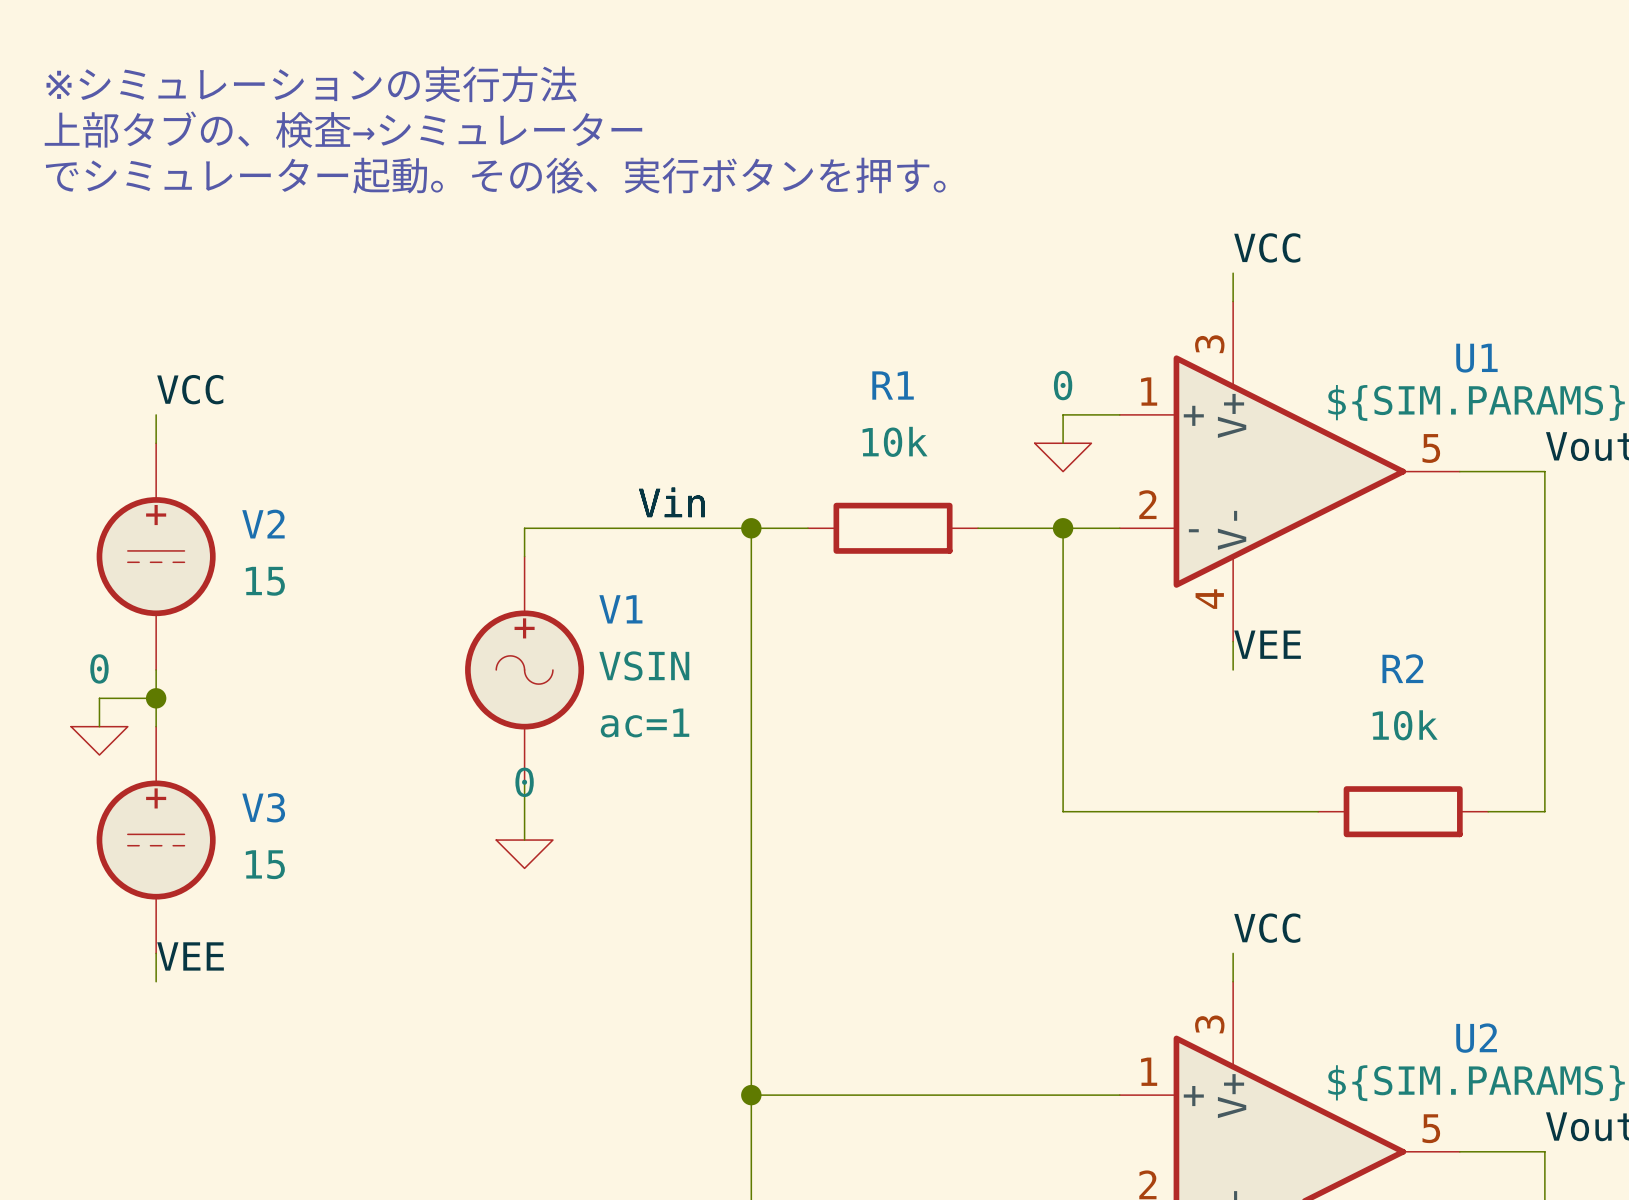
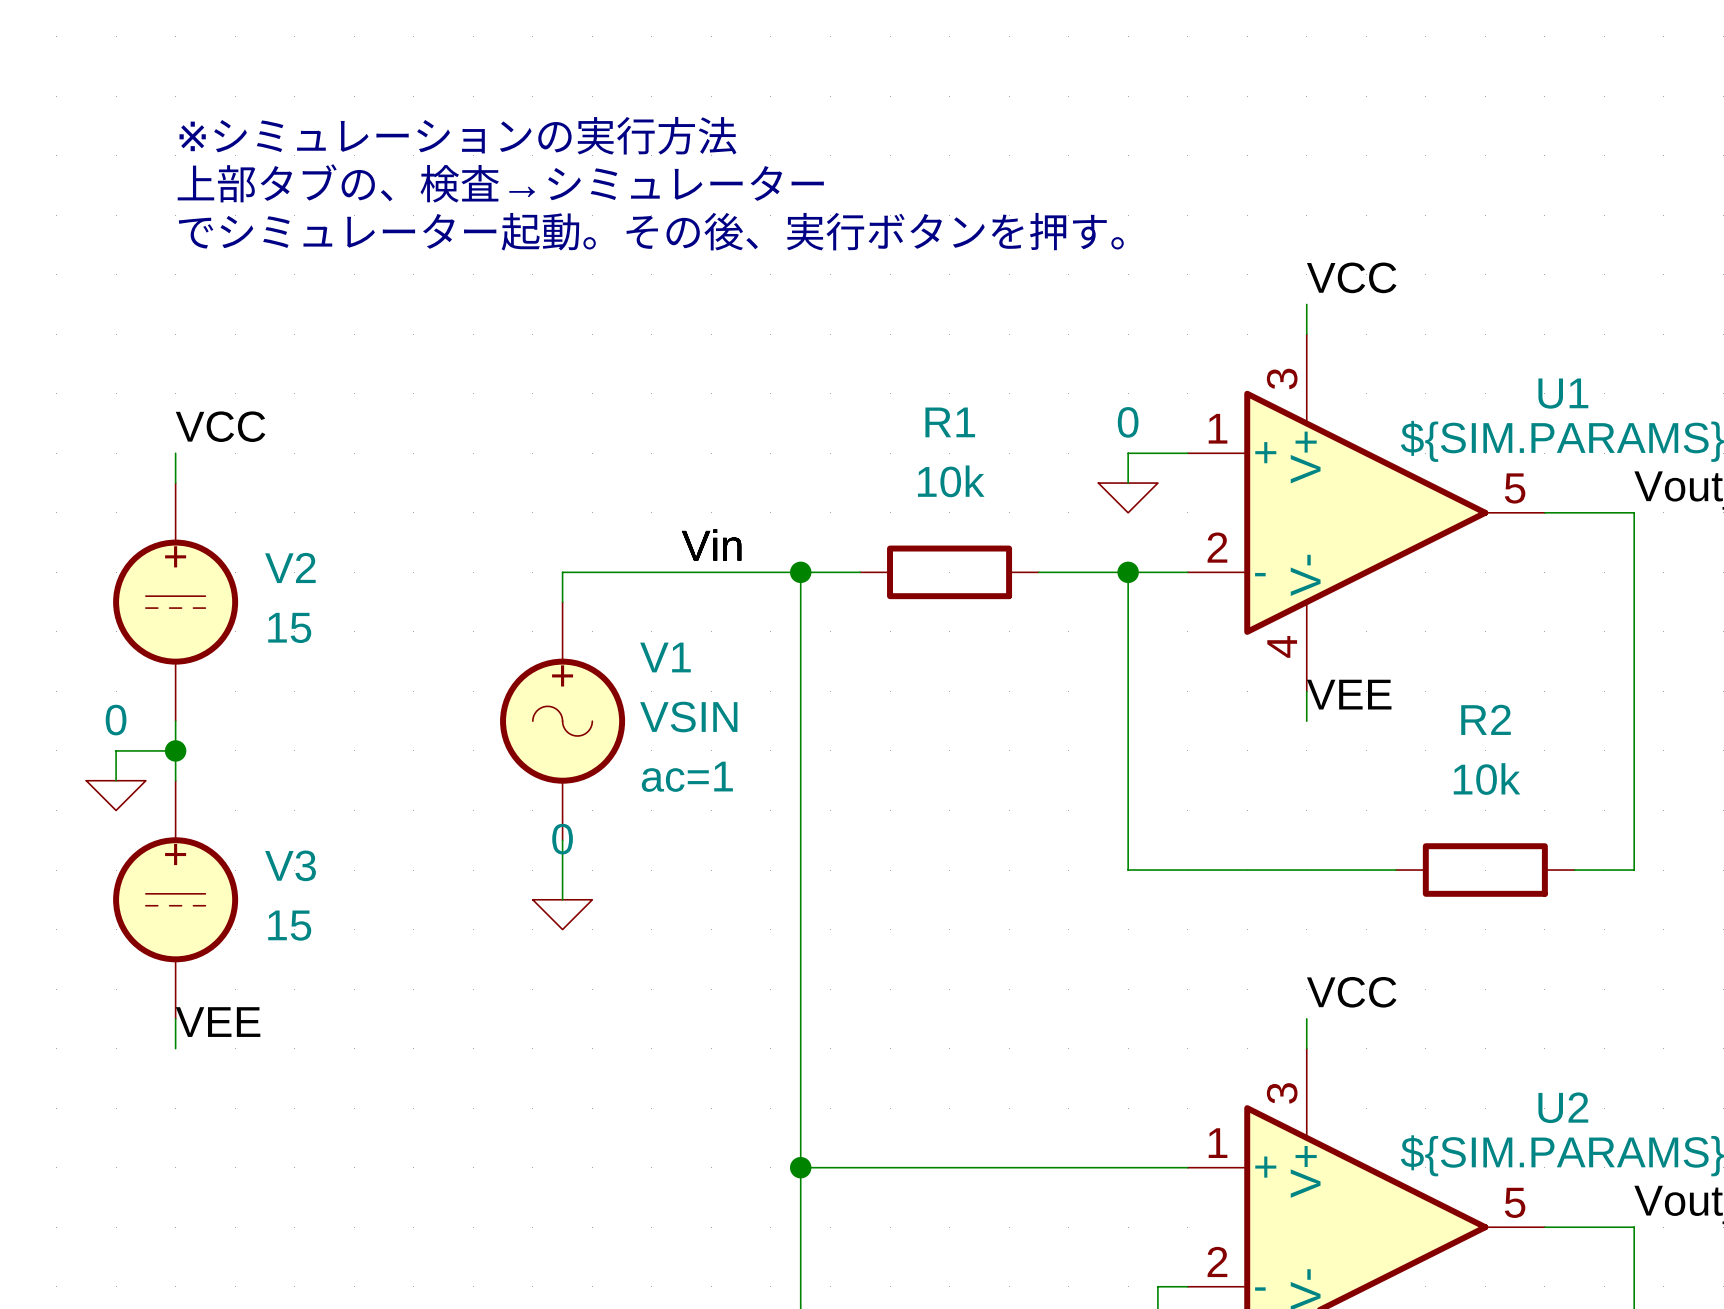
text position: ※シミュレーションの実行方法 (311, 84) -> ※シミュレーションの実行方法 (457, 135)
text position: 上部タブの、検査→シミュレーター (343, 129) -> 上部タブの、検査→シミュレーター (500, 183)
text position: でシミュレーター起動。その後、実行ボタンを押す。 (495, 175) -> でシミュレーター起動。その後、実行ボタンを押す。 (651, 231)

